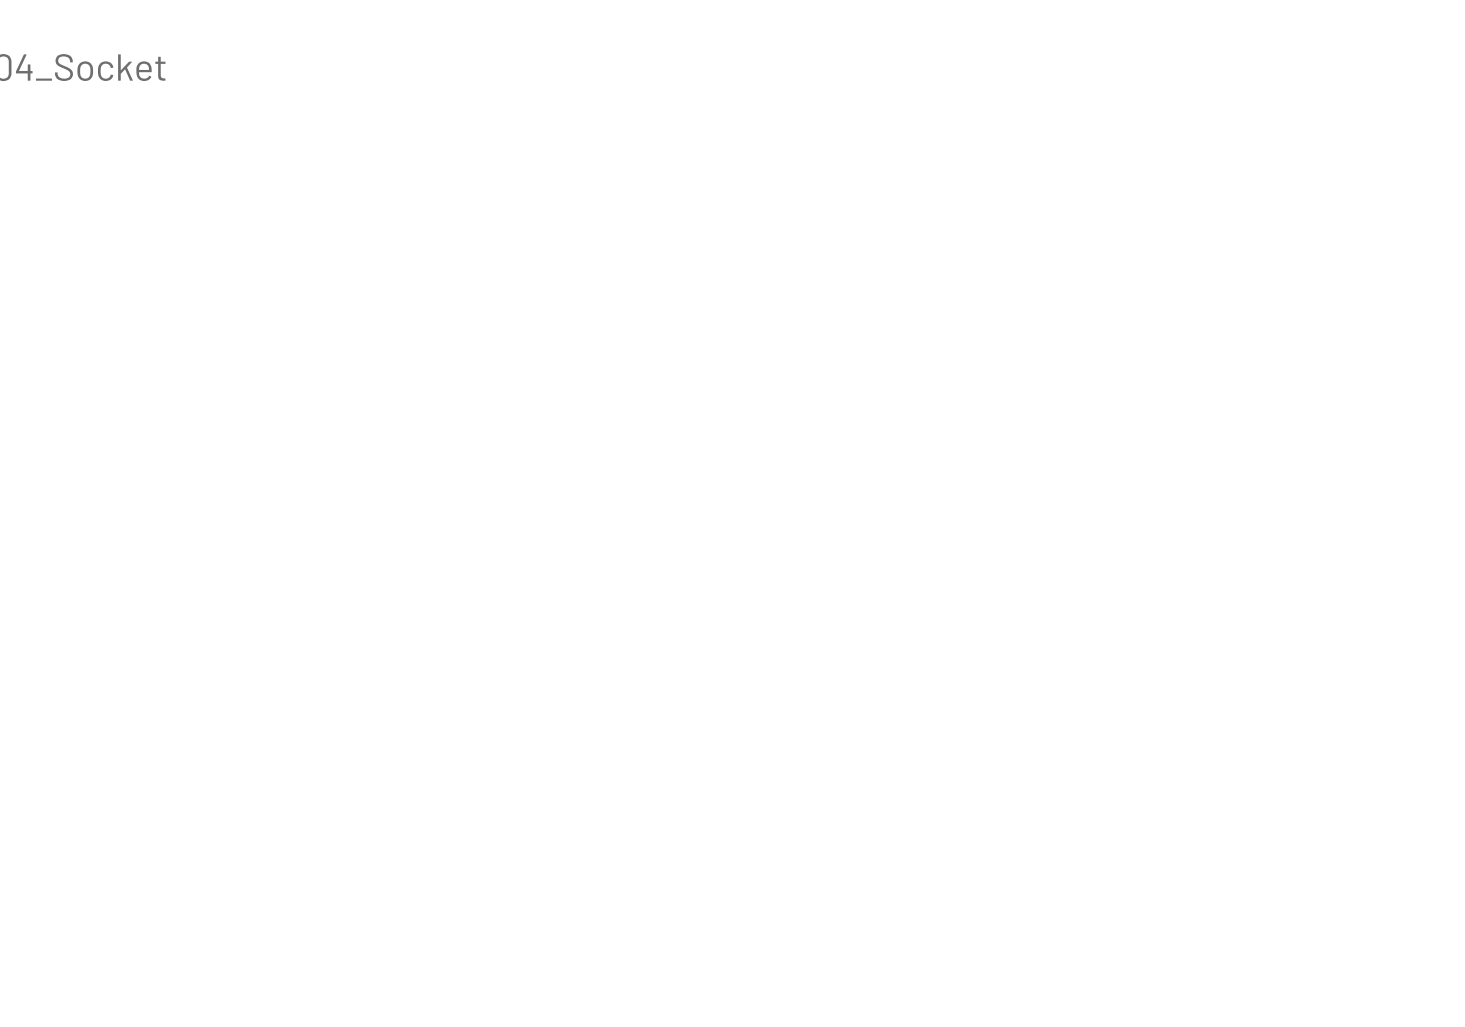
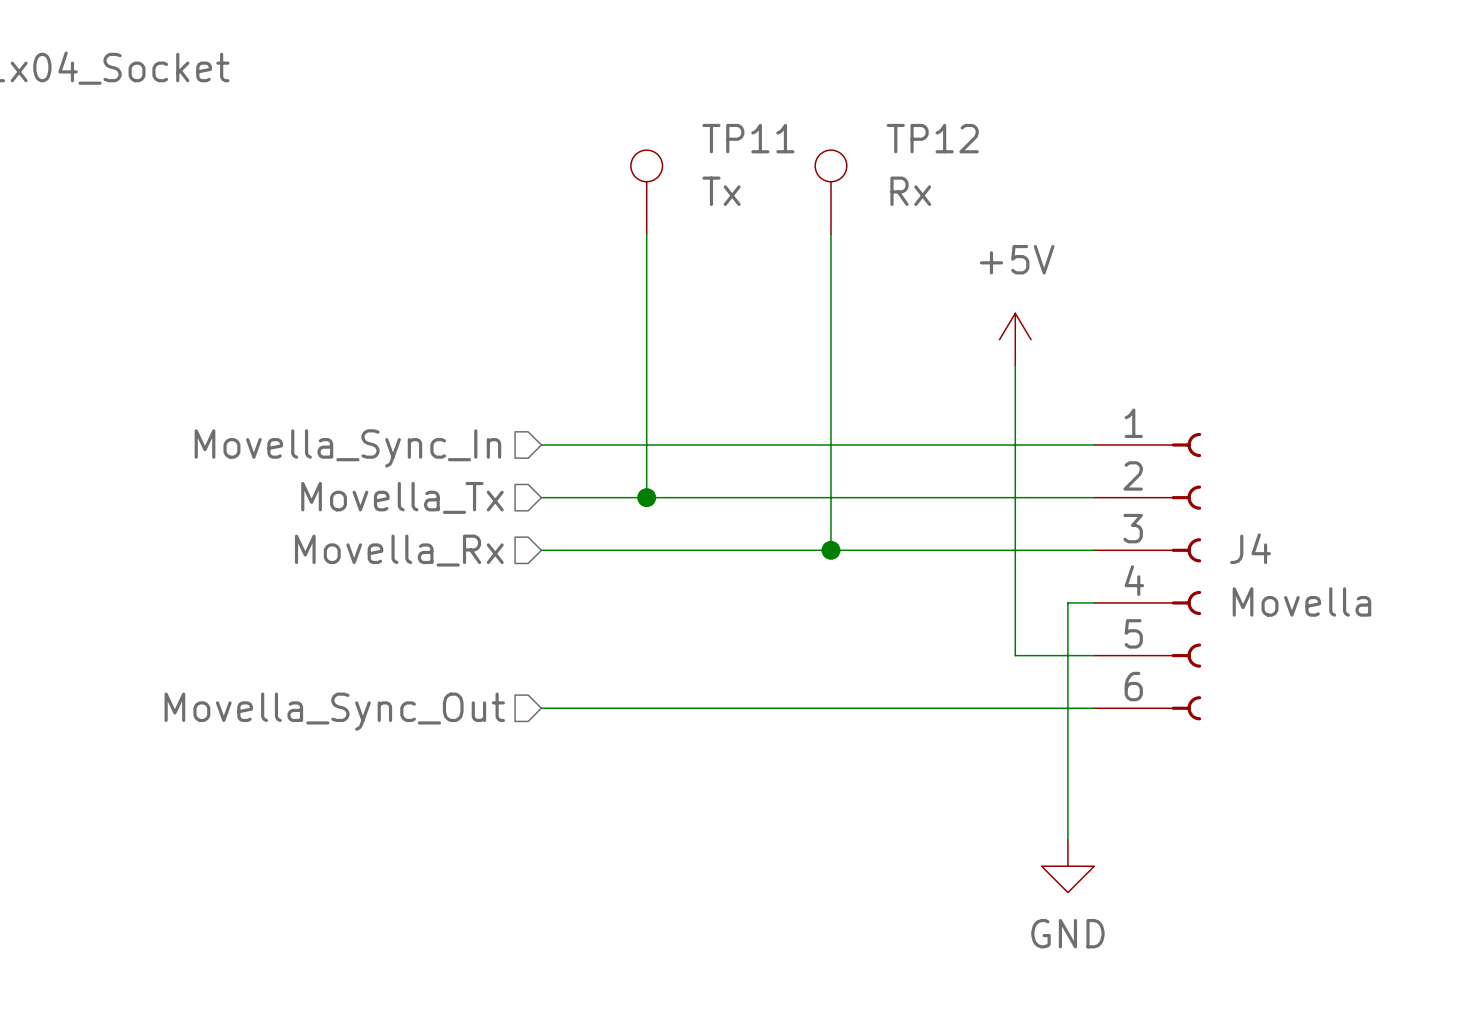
TP11: none -> Tx (646, 192)
TP12: none -> Rx (830, 192)
wire: none -> (646, 234) (646, 497)
wire: none -> (830, 234) (830, 550)
power symbol: none -> +5V (1015, 339)
wire: none -> (1015, 366) (1015, 655) (1094, 655)
wire: none -> (541, 445) (1094, 445)
hierarchical label: none -> Movella_Sync_In (347, 448)
hierarchical label: none -> Movella_Tx (402, 497)
wire: none -> (541, 497) (1094, 497)
junction: none -> (646, 497)
hierarchical label: none -> Movella_Rx (399, 550)
wire: none -> (541, 550) (1094, 550)
junction: none -> (830, 550)
J4: none -> Movella (1147, 576)
wire: none -> (1094, 602) (1067, 602) (1067, 839)
wire: none -> (541, 708) (1094, 708)
hierarchical label: none -> Movella_Sync_Out (334, 711)
power symbol: none -> GND (1067, 866)

